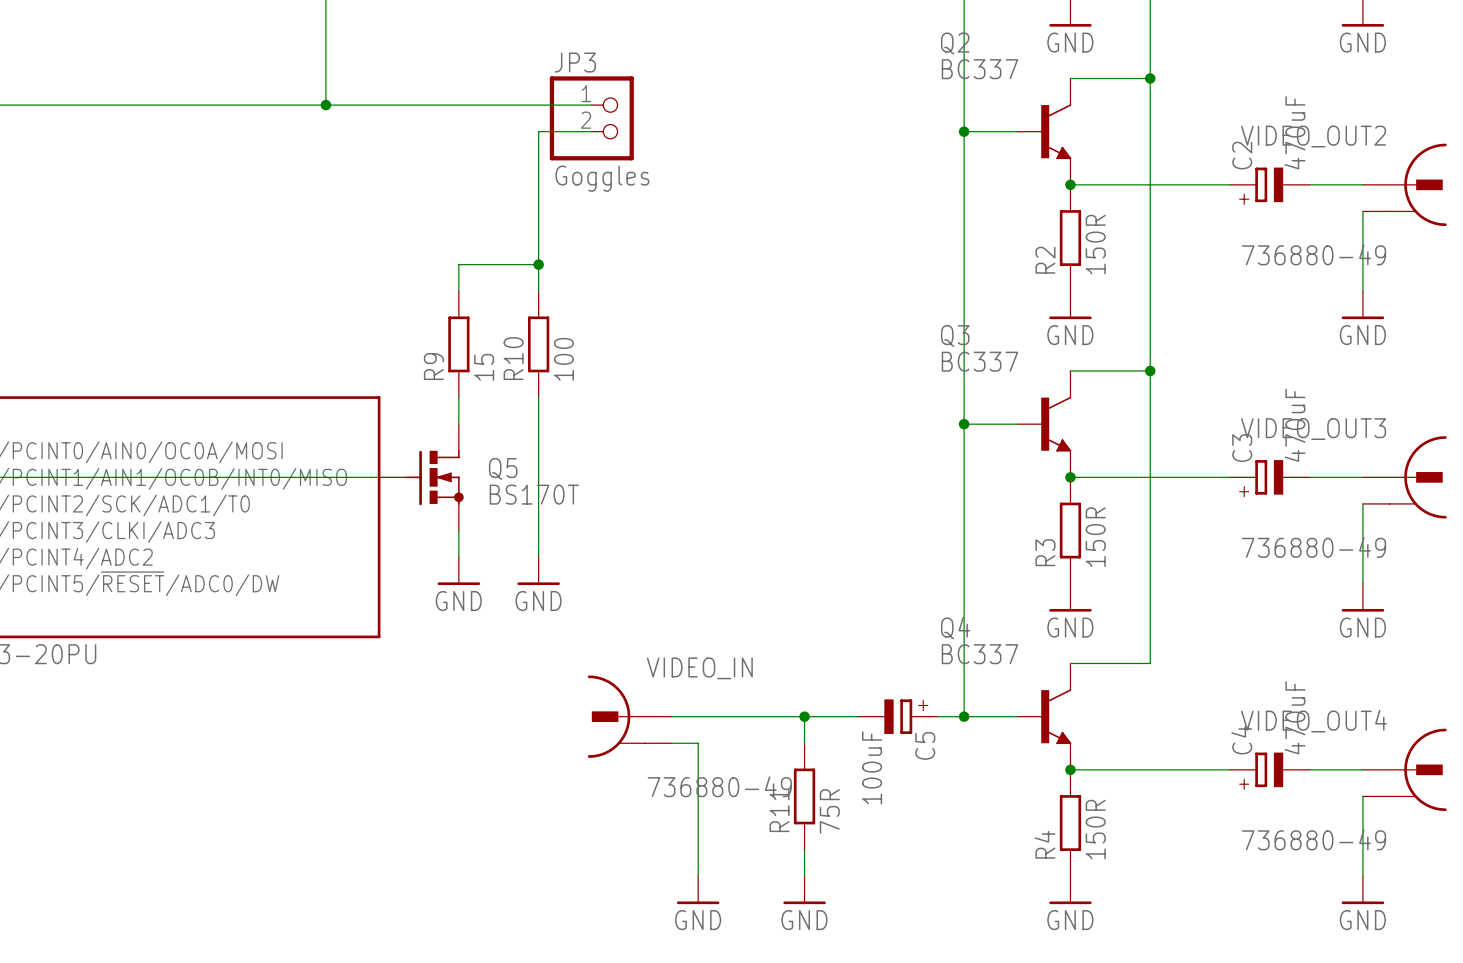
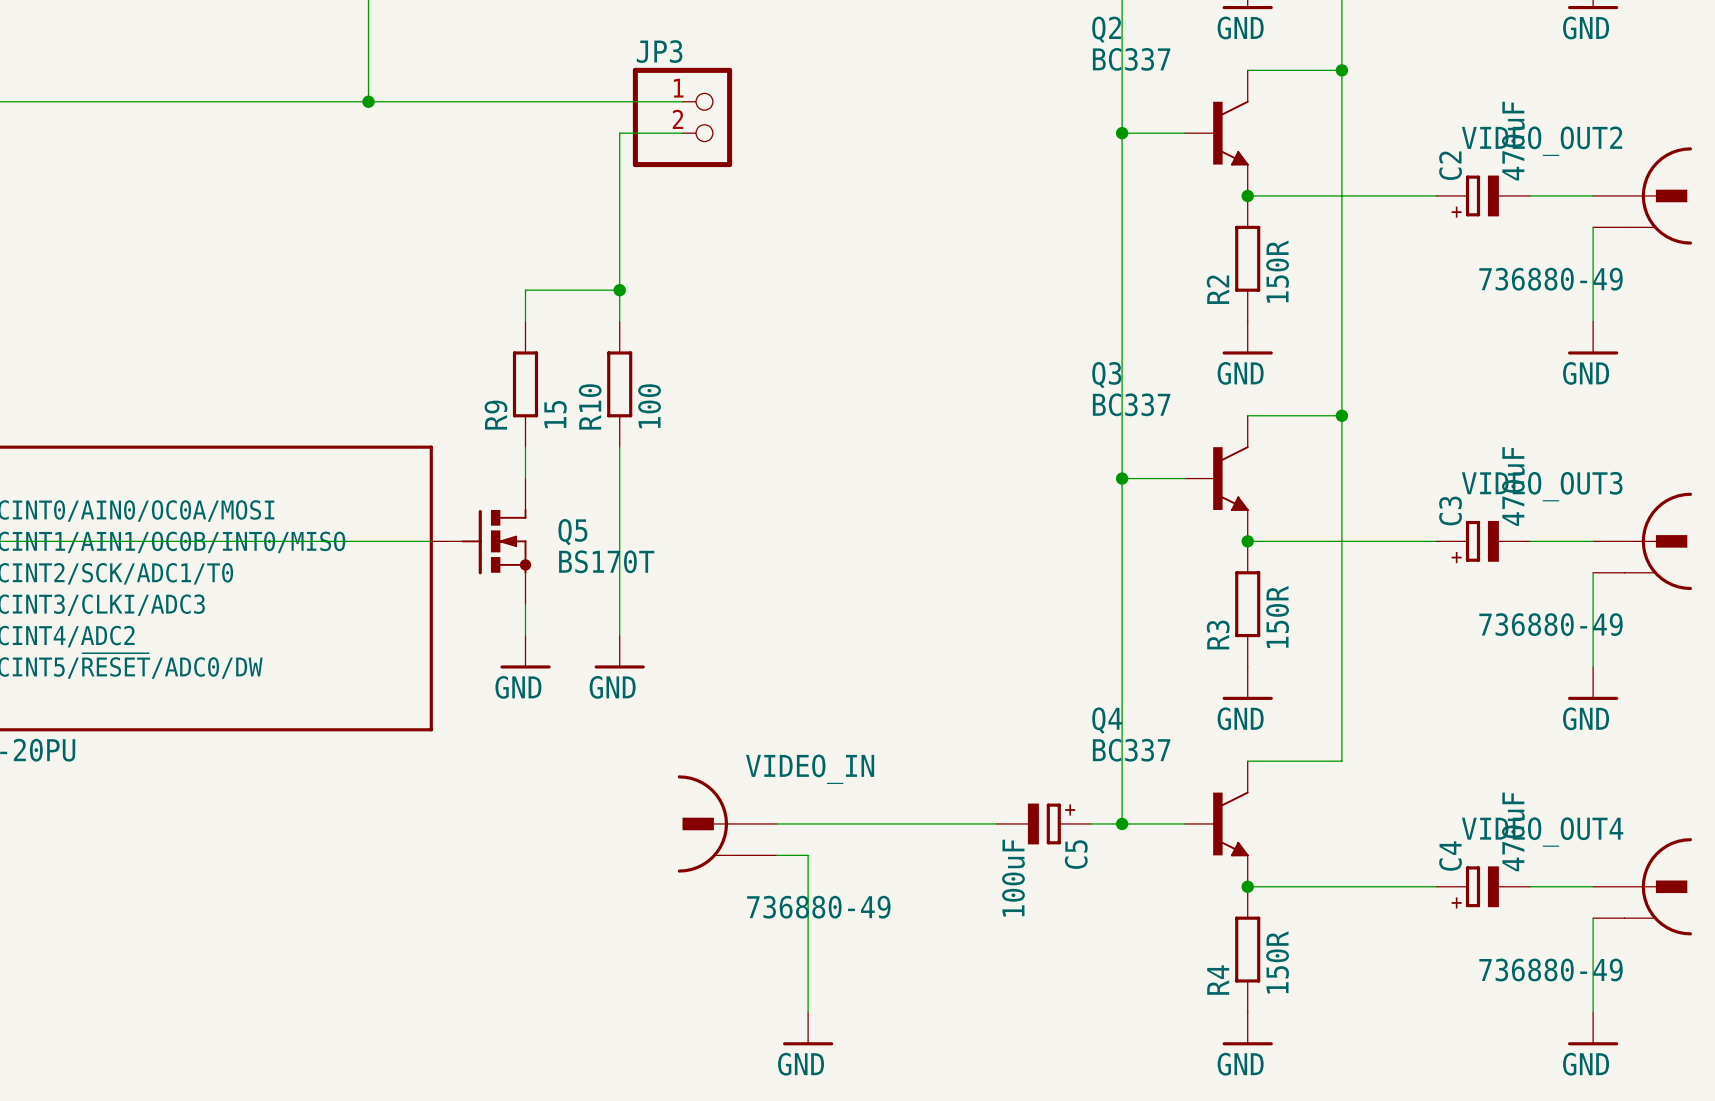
JP3 value: Goggles (602, 178) -> none
wire: (804, 716) (804, 743) -> none
junction: (804, 716) -> none
R11: 75R (804, 796) -> none
wire: (804, 849) (804, 876) -> none
power symbol: GND (804, 890) -> none

